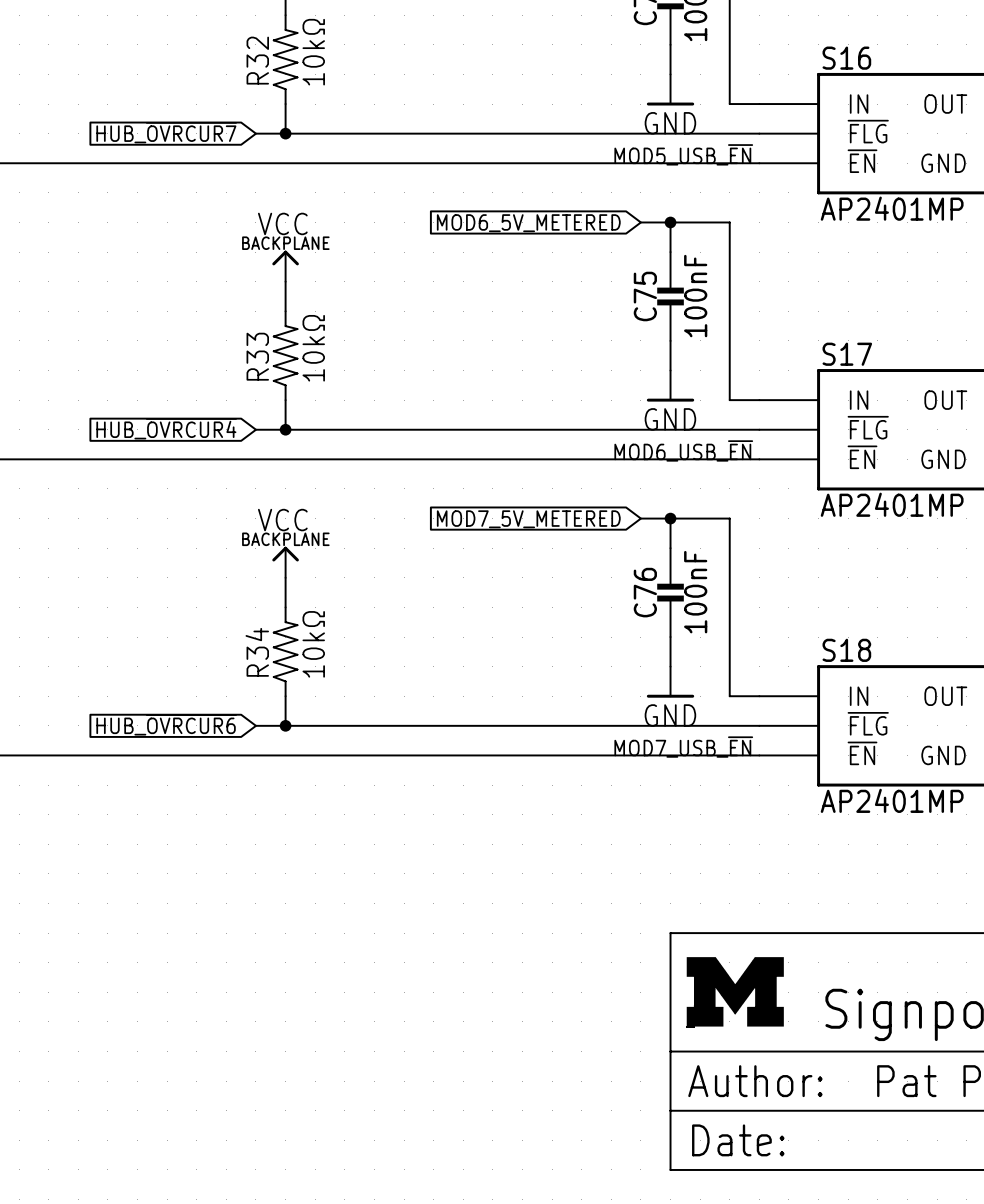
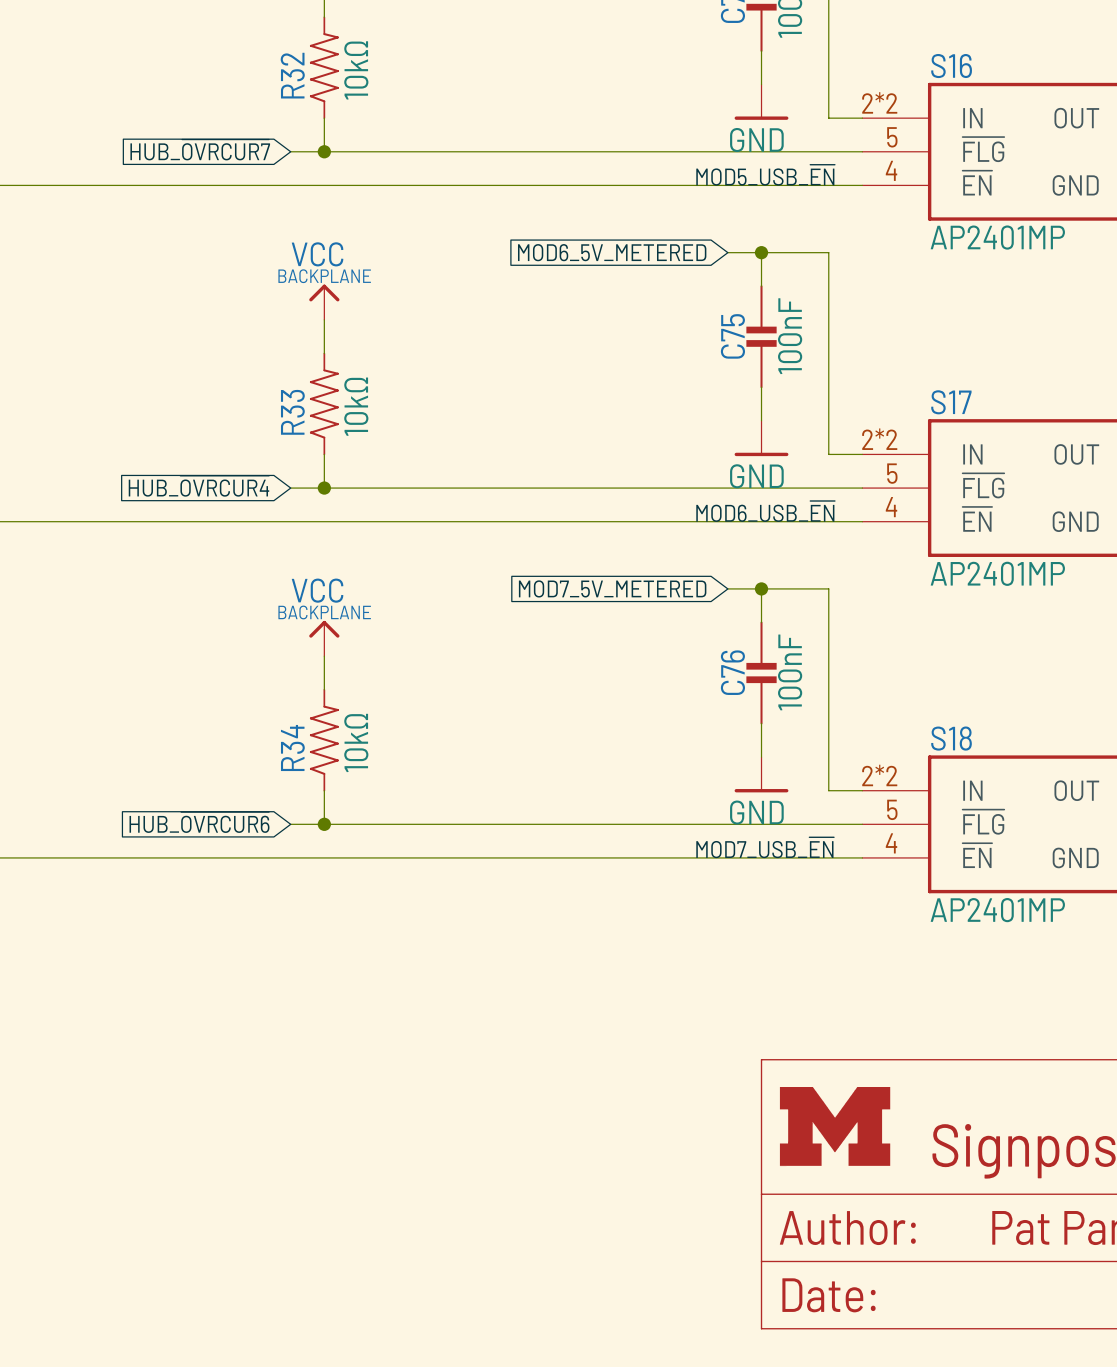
S16 pin number: none -> 2*2 (879, 102)
S16 pin number: none -> 5 (892, 137)
S16 pin number: none -> 4 (891, 170)
S17 pin number: none -> 2*2 (879, 439)
S17 pin number: none -> 5 (892, 473)
S17 pin number: none -> 4 (891, 507)
S18 pin number: none -> 2*2 (879, 775)
S18 pin number: none -> 5 (892, 809)
S18 pin number: none -> 4 (891, 843)

